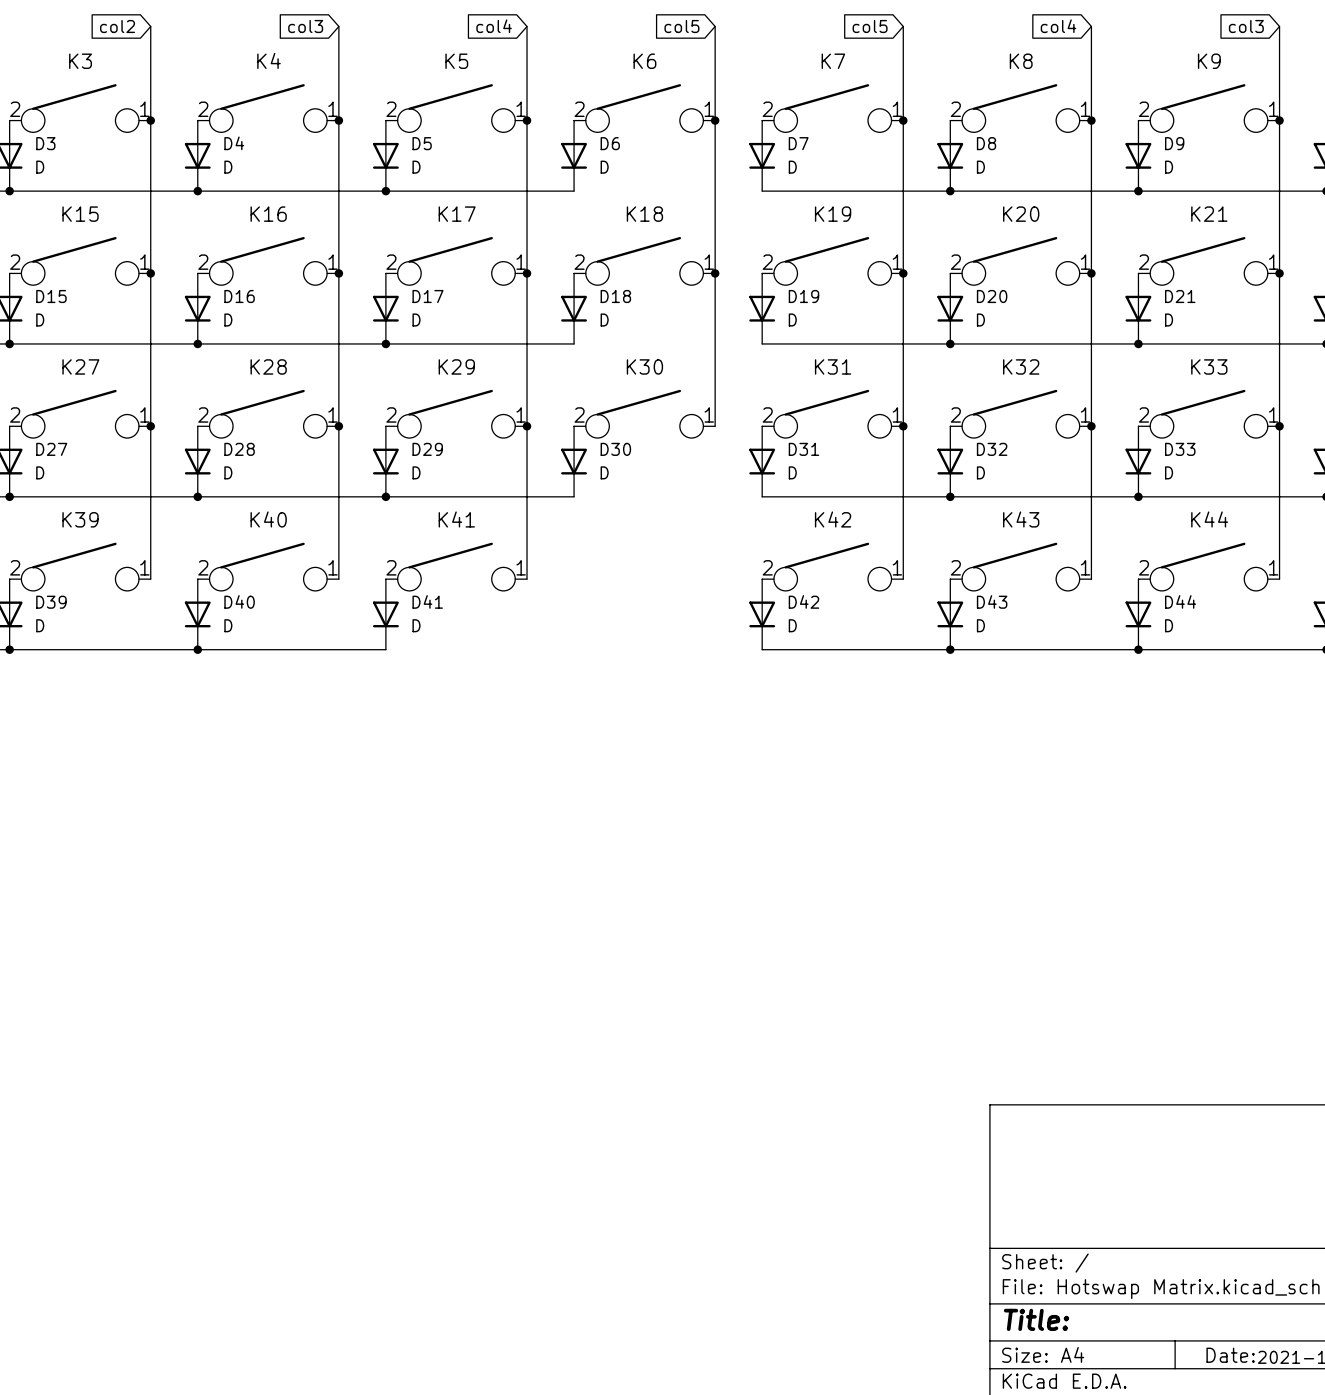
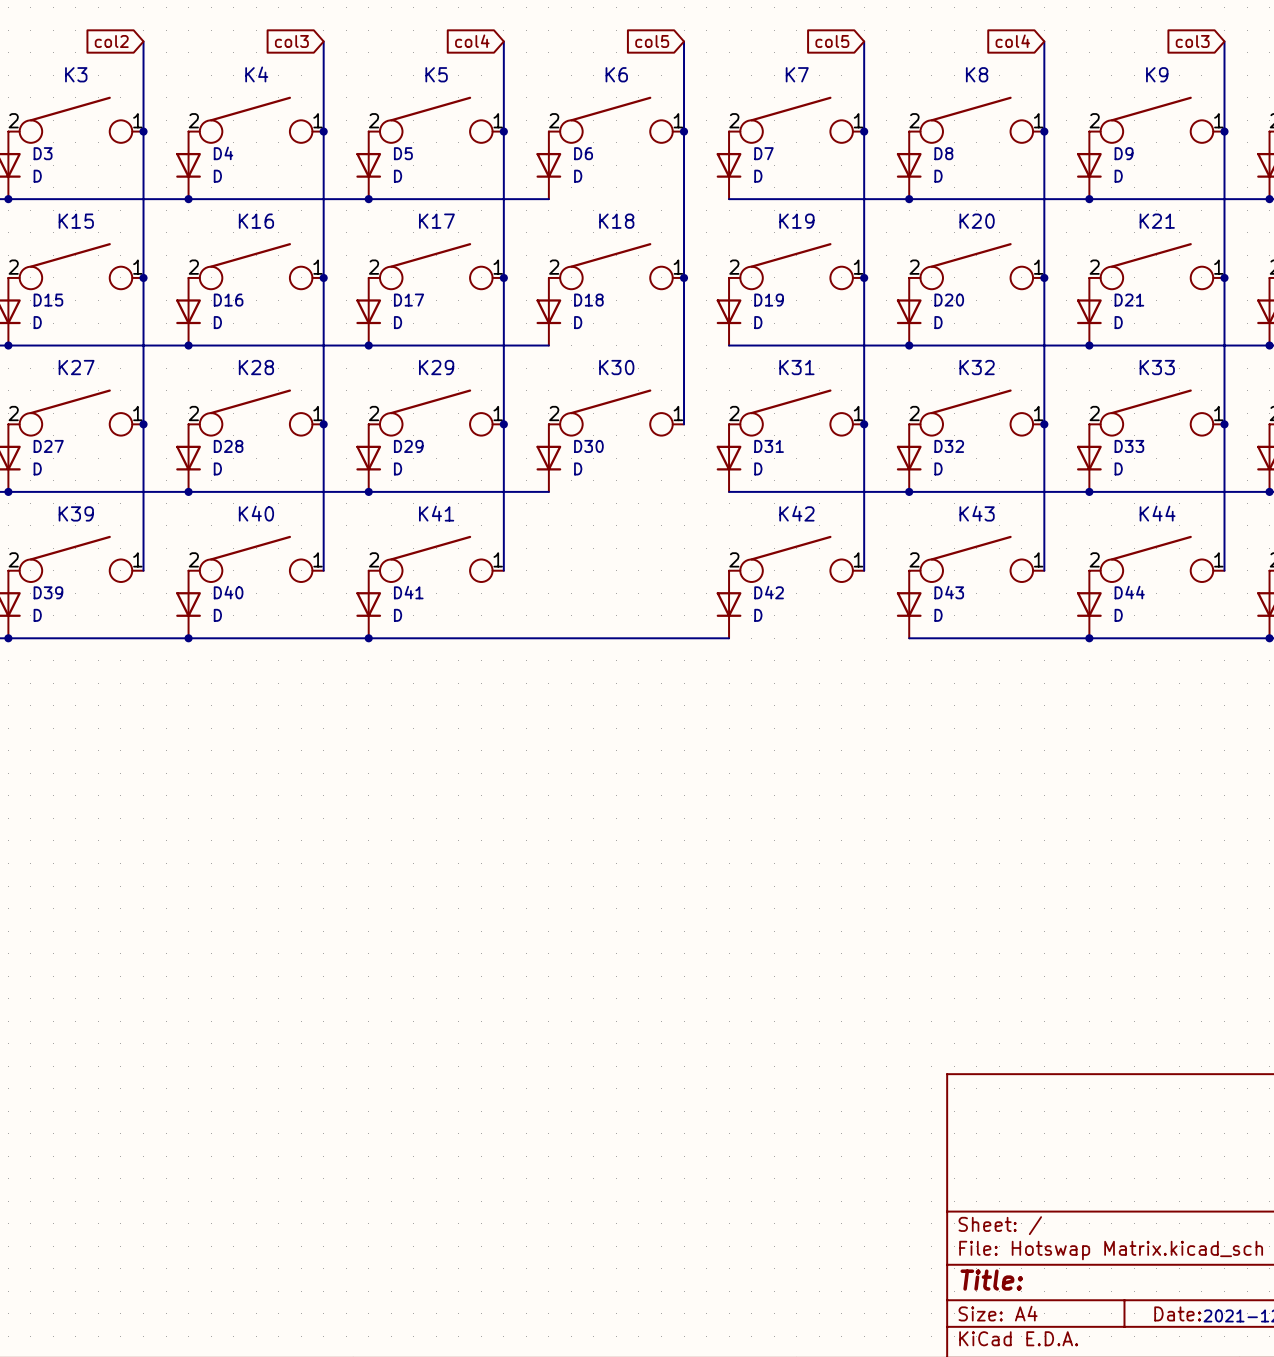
junction: none -> (368, 638)
wire: (762, 649) (950, 649) -> (729, 638) (368, 638)
junction: (950, 649) -> none

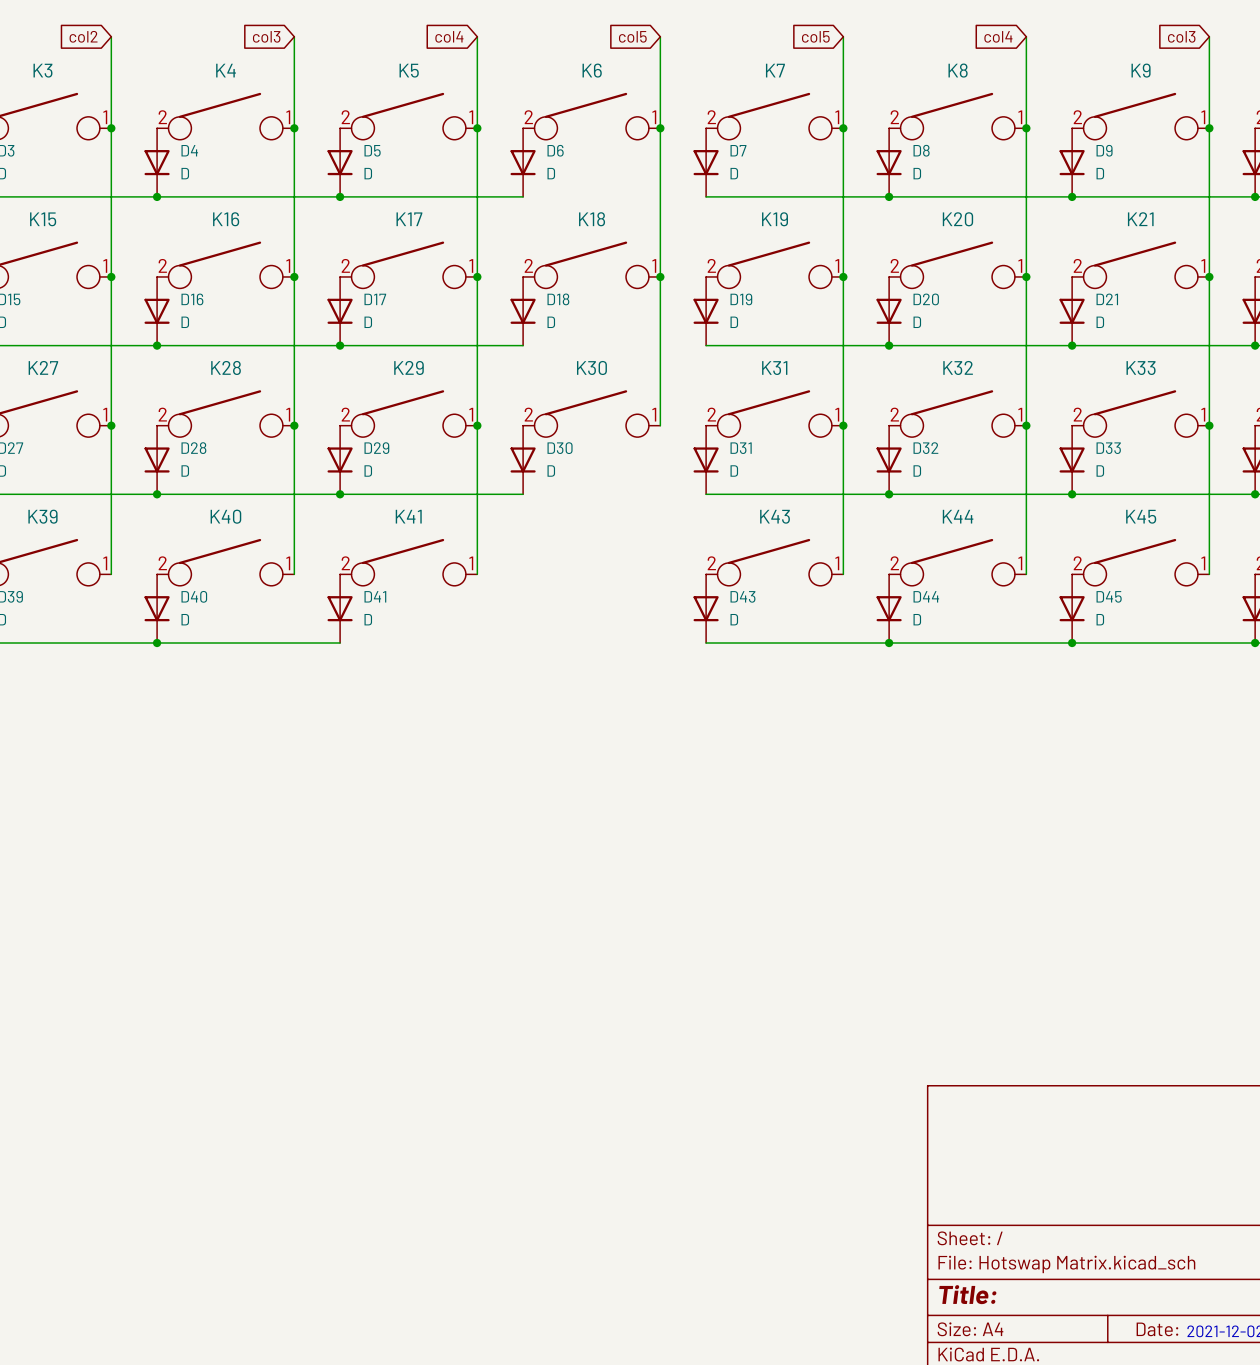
K42 name: K42 (796, 513) -> K43 (775, 516)
K43 name: K43 (977, 513) -> K44 (958, 516)
K44 name: K44 (1157, 513) -> K45 (1141, 516)
D42 name: D42 (769, 592) -> D43 (742, 596)
D43 name: D43 (949, 592) -> D44 (926, 596)
D44 name: D44 (1129, 592) -> D45 (1109, 596)
wire: (368, 638) (729, 638) -> (889, 643) (706, 643)
junction: (368, 638) -> none
junction: none -> (889, 643)

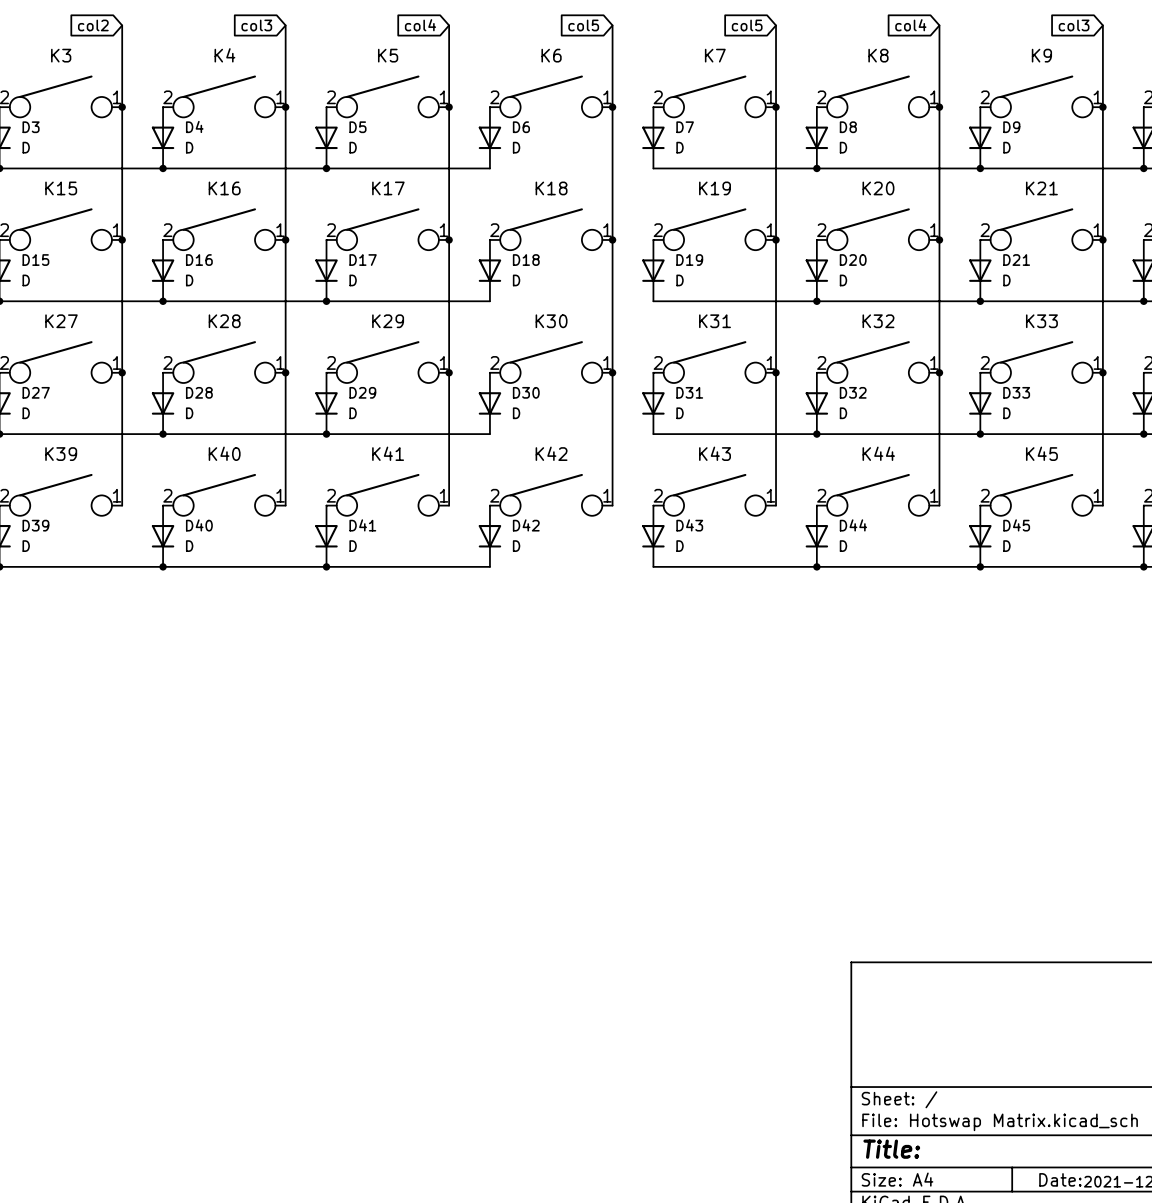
wire: none -> (612, 372) (612, 505)
junction: none -> (612, 372)
K42: none -> (551, 494)
D42: none -> D (489, 536)
wire: none -> (326, 566) (489, 566)
junction: none -> (326, 566)

